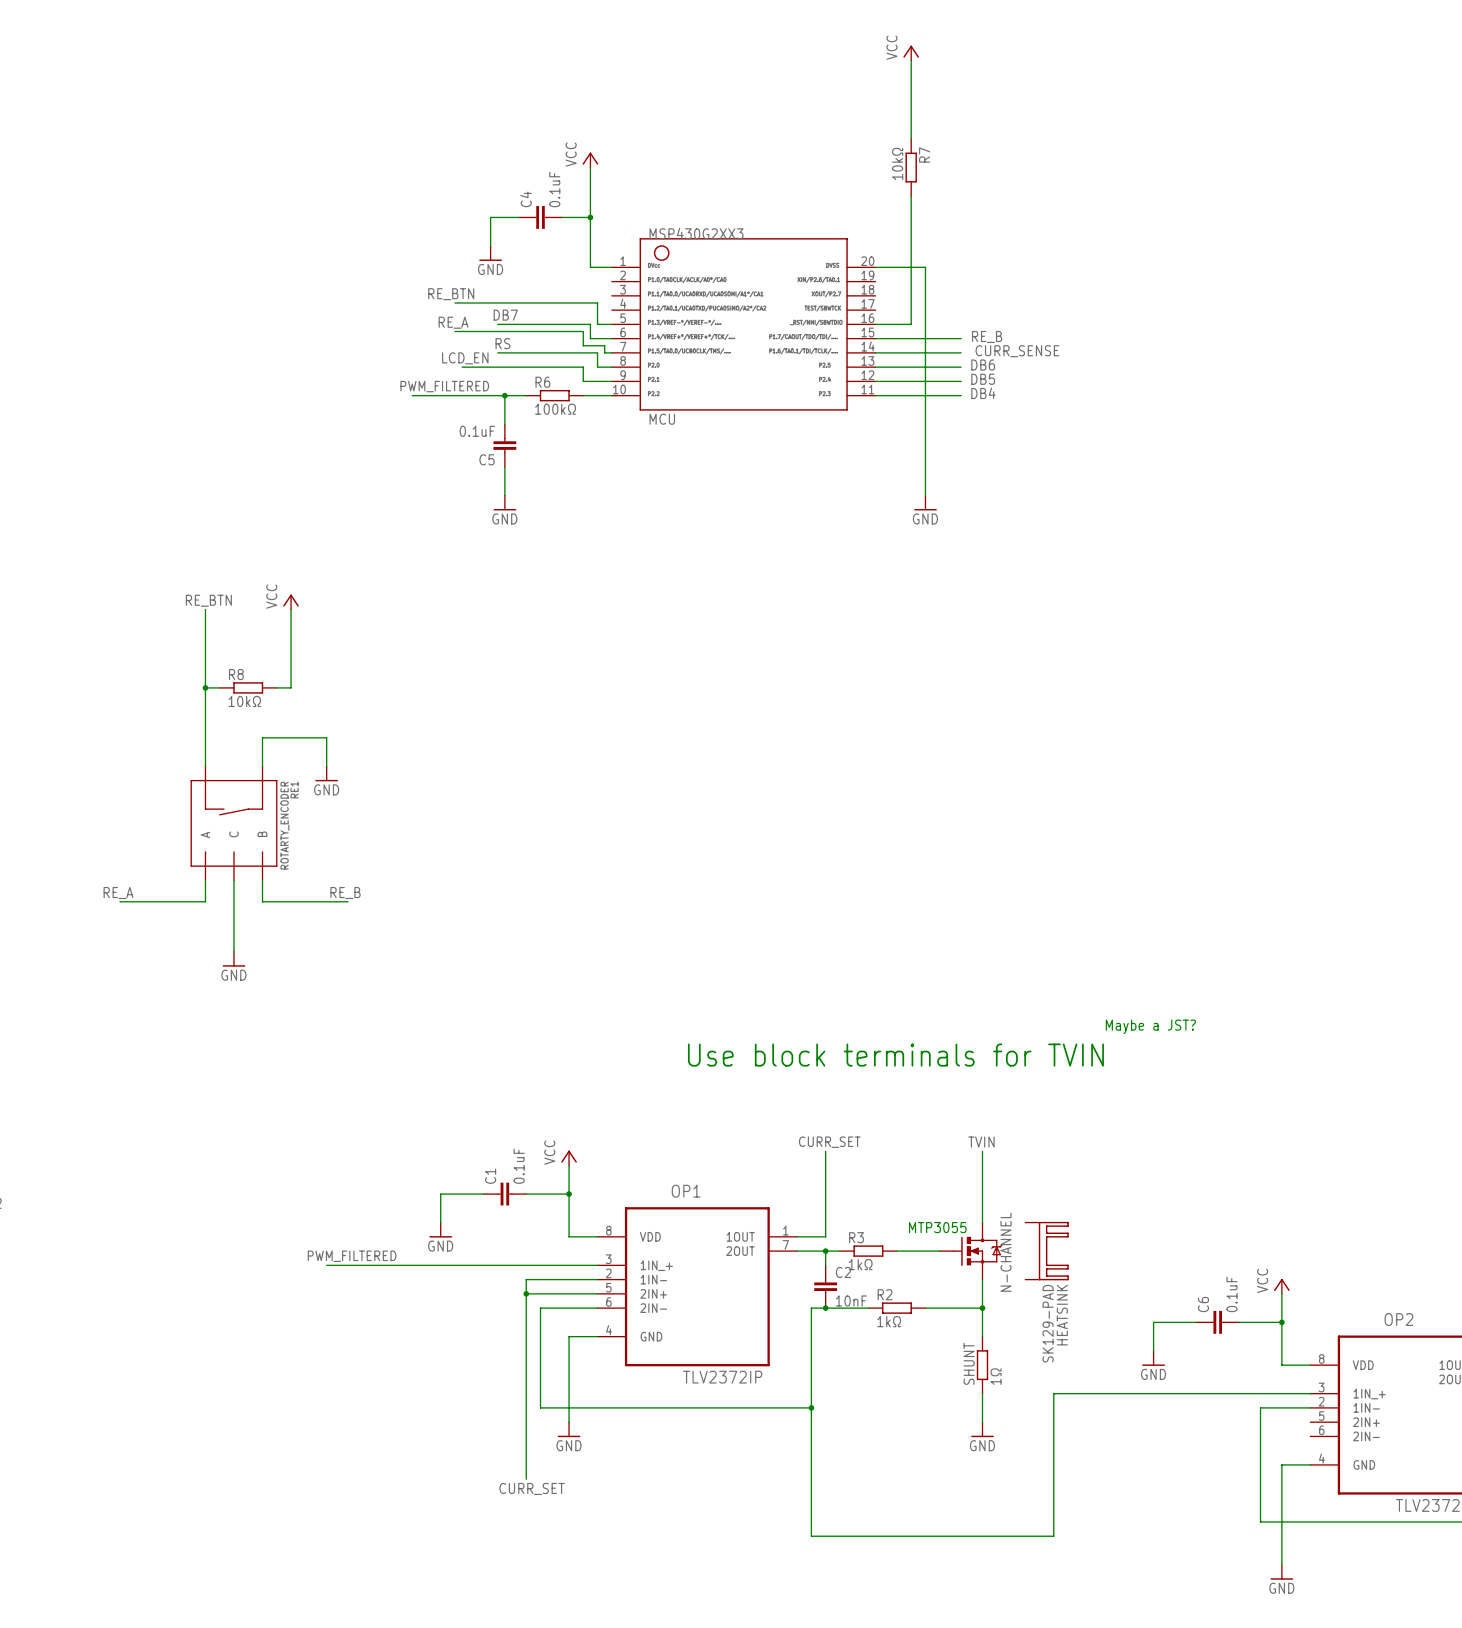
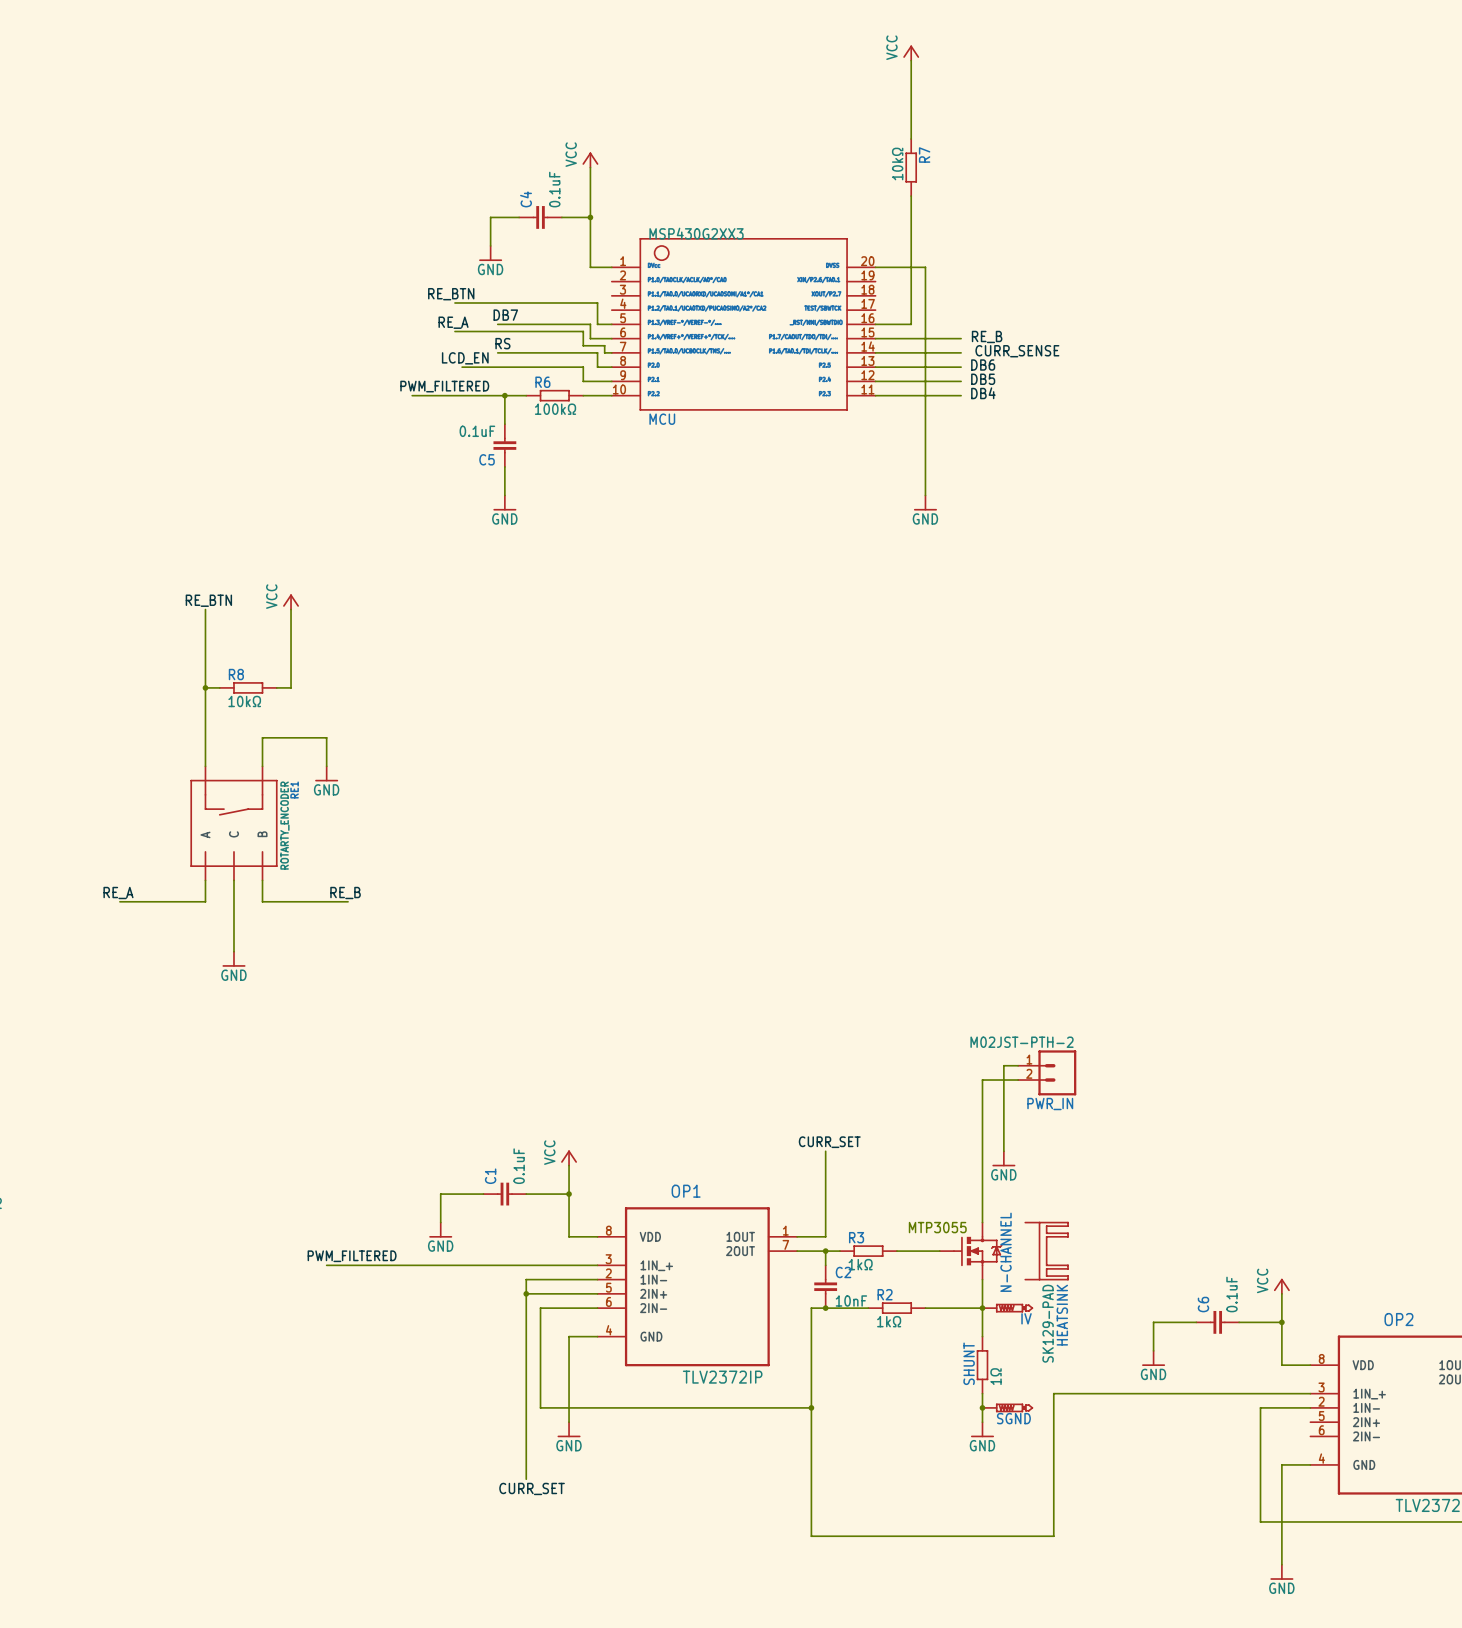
text: Maybe a JST? (1150, 1026) -> none
text: Use block terminals for TVIN (895, 1055) -> none
wire: none -> (1018, 1065) (1003, 1065) (1003, 1151)
PWR_IN: none -> M02JST-PTH-2 (1047, 1072)
wire: none -> (1018, 1080) (982, 1080) (982, 1151)
label: TVIN (981, 1142) -> none
power symbol: none -> GND (1003, 1158)
IV: none -> (1007, 1308)
junction: none -> (982, 1407)
SGND: none -> (1007, 1407)

